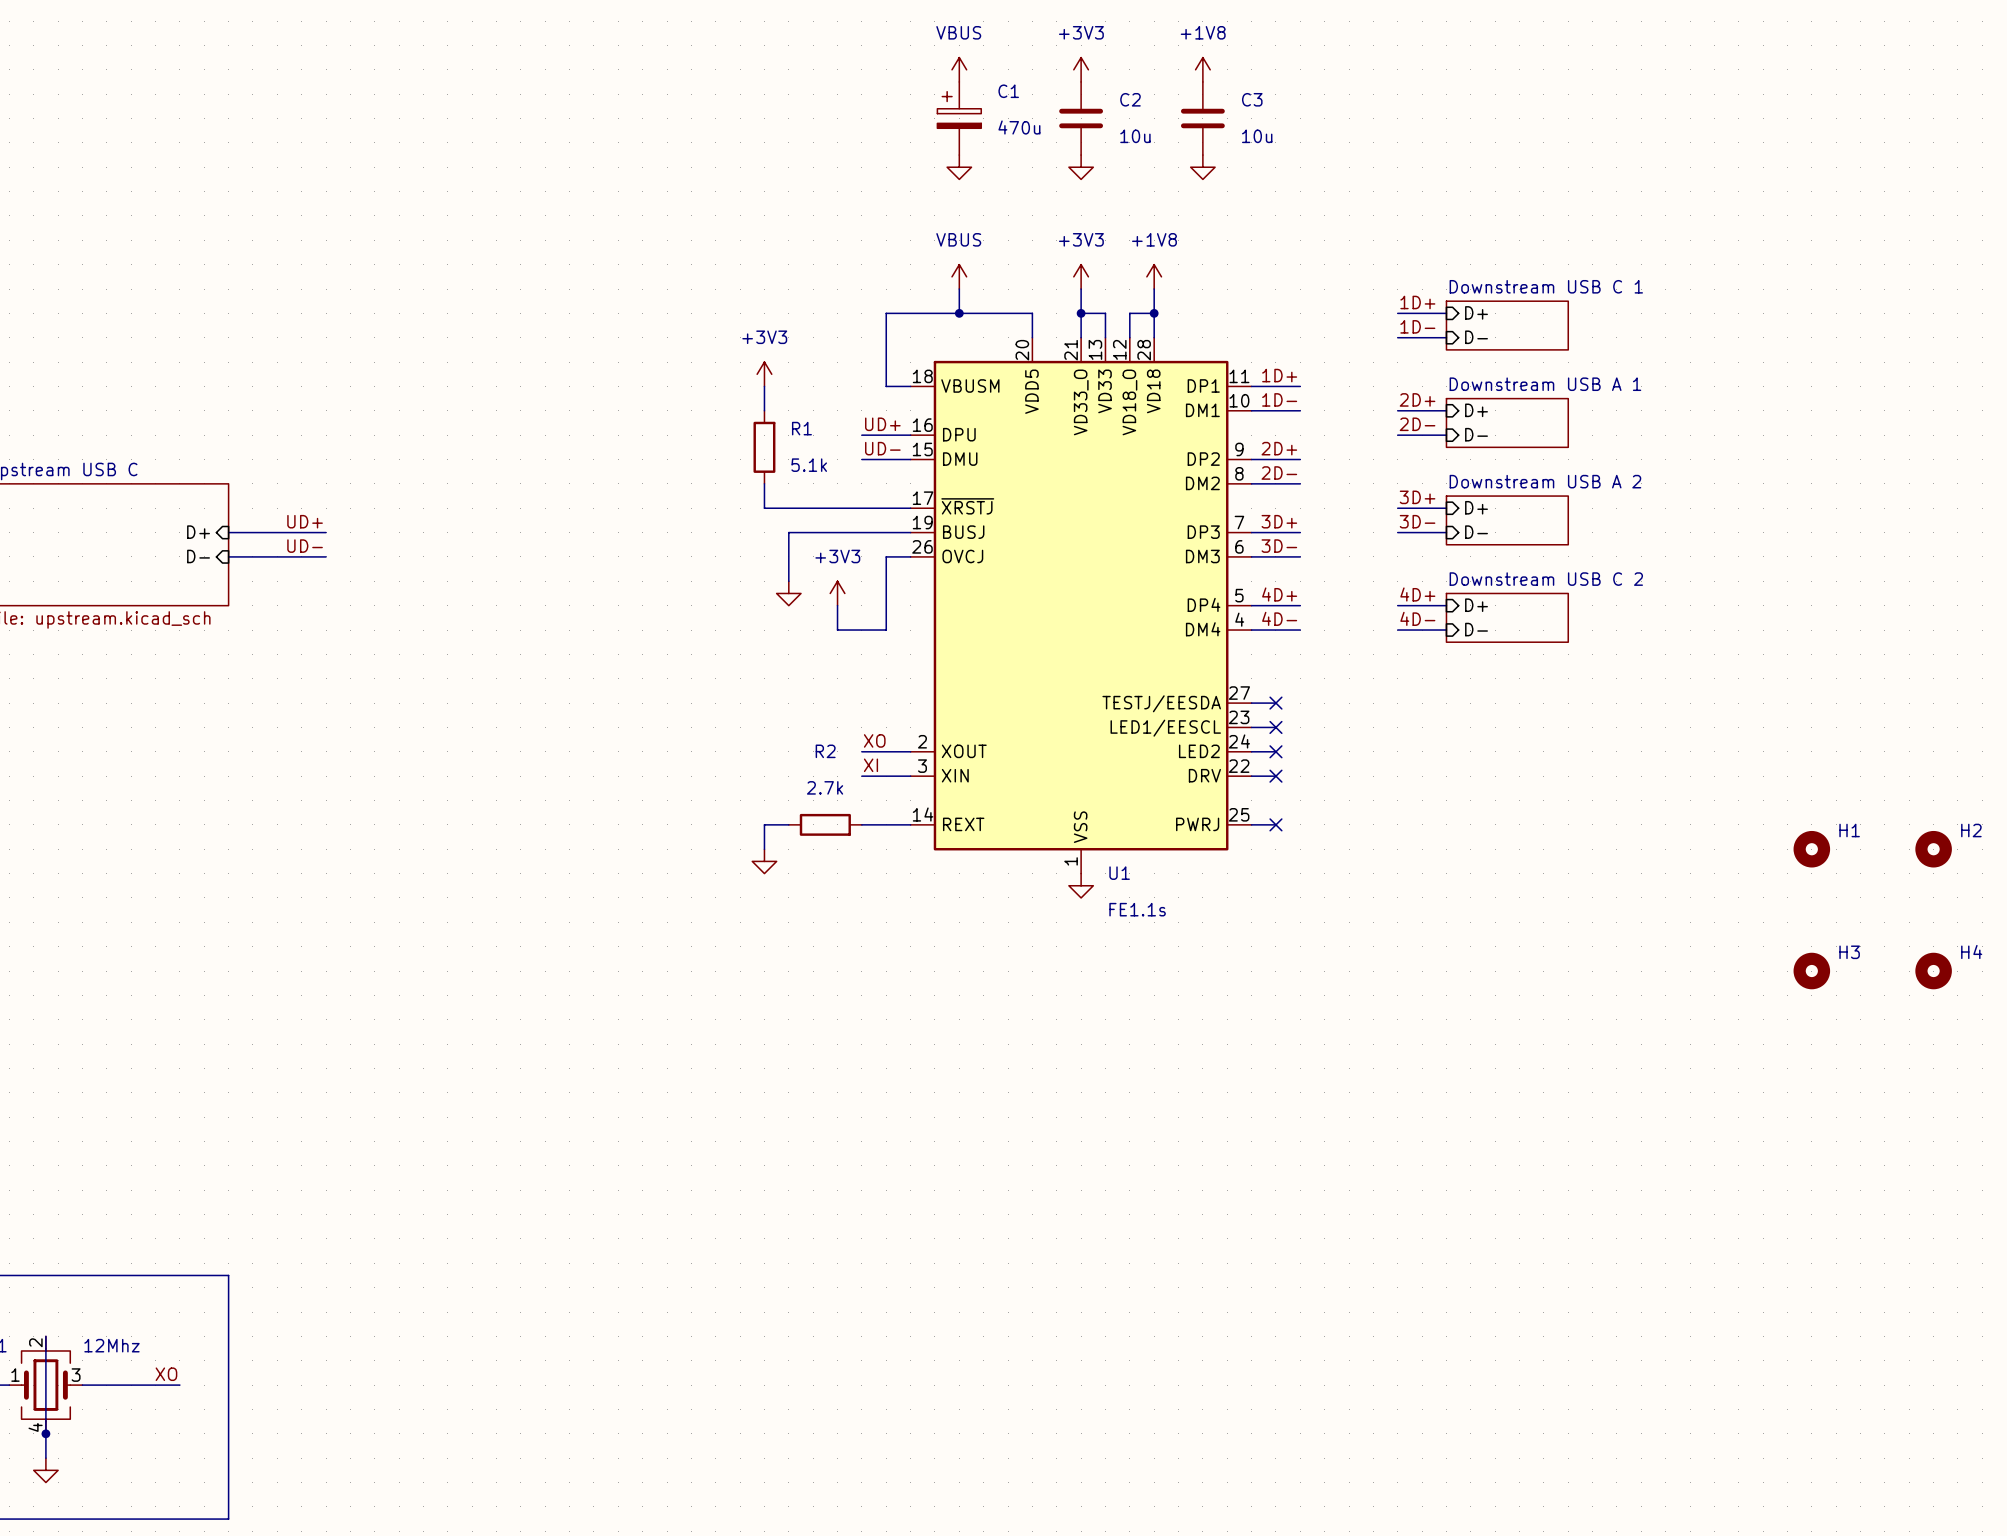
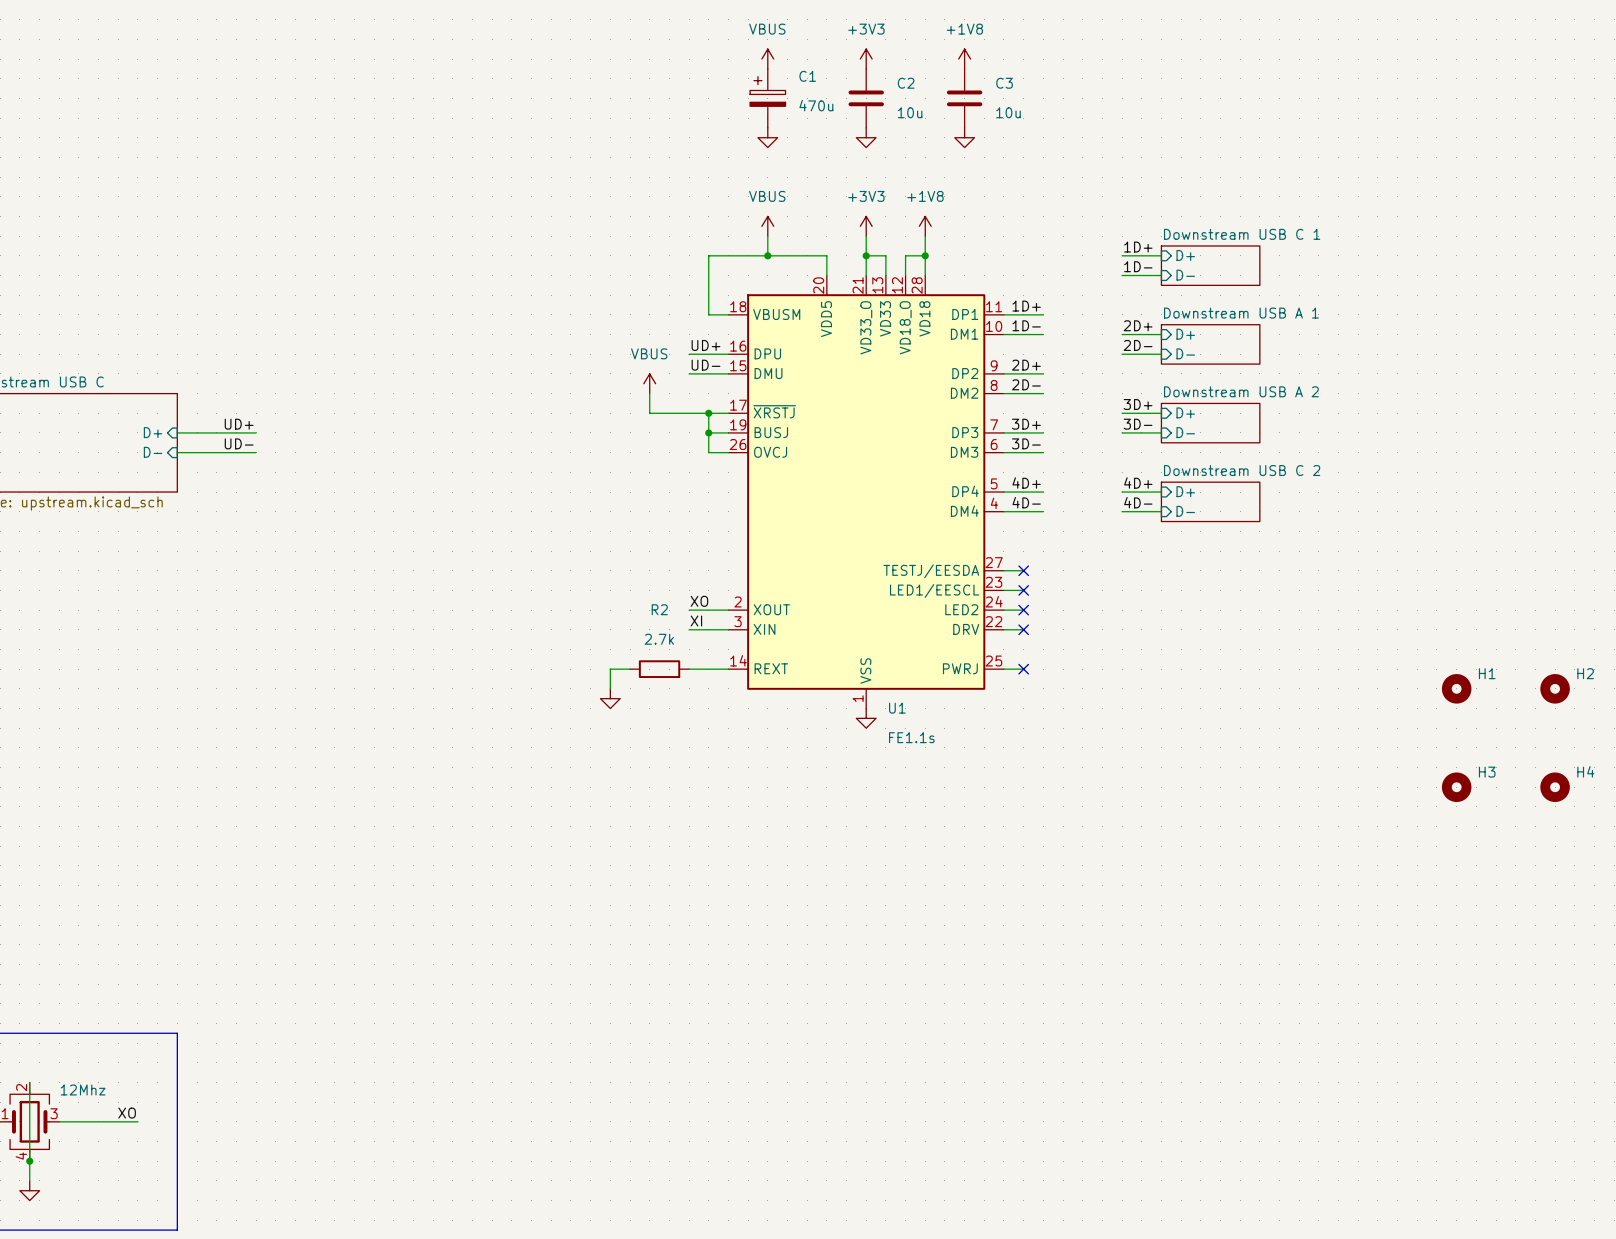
power symbol: +3V3 (764, 374) -> none
wire: (764, 386) (764, 410) -> none
R1: 5.1k (764, 447) -> none
power symbol: none -> VBUS (649, 383)
wire: (764, 483) (764, 508) (813, 508) -> (649, 393) (649, 413)
junction: none -> (708, 413)
wire: (886, 532) (788, 532) (788, 581) -> none
junction: none -> (708, 432)
wire: (886, 556) (886, 630) (837, 630) (837, 605) -> (708, 452) (708, 413)
power symbol: (788, 593) -> none
power symbol: +3V3 (837, 593) -> none

